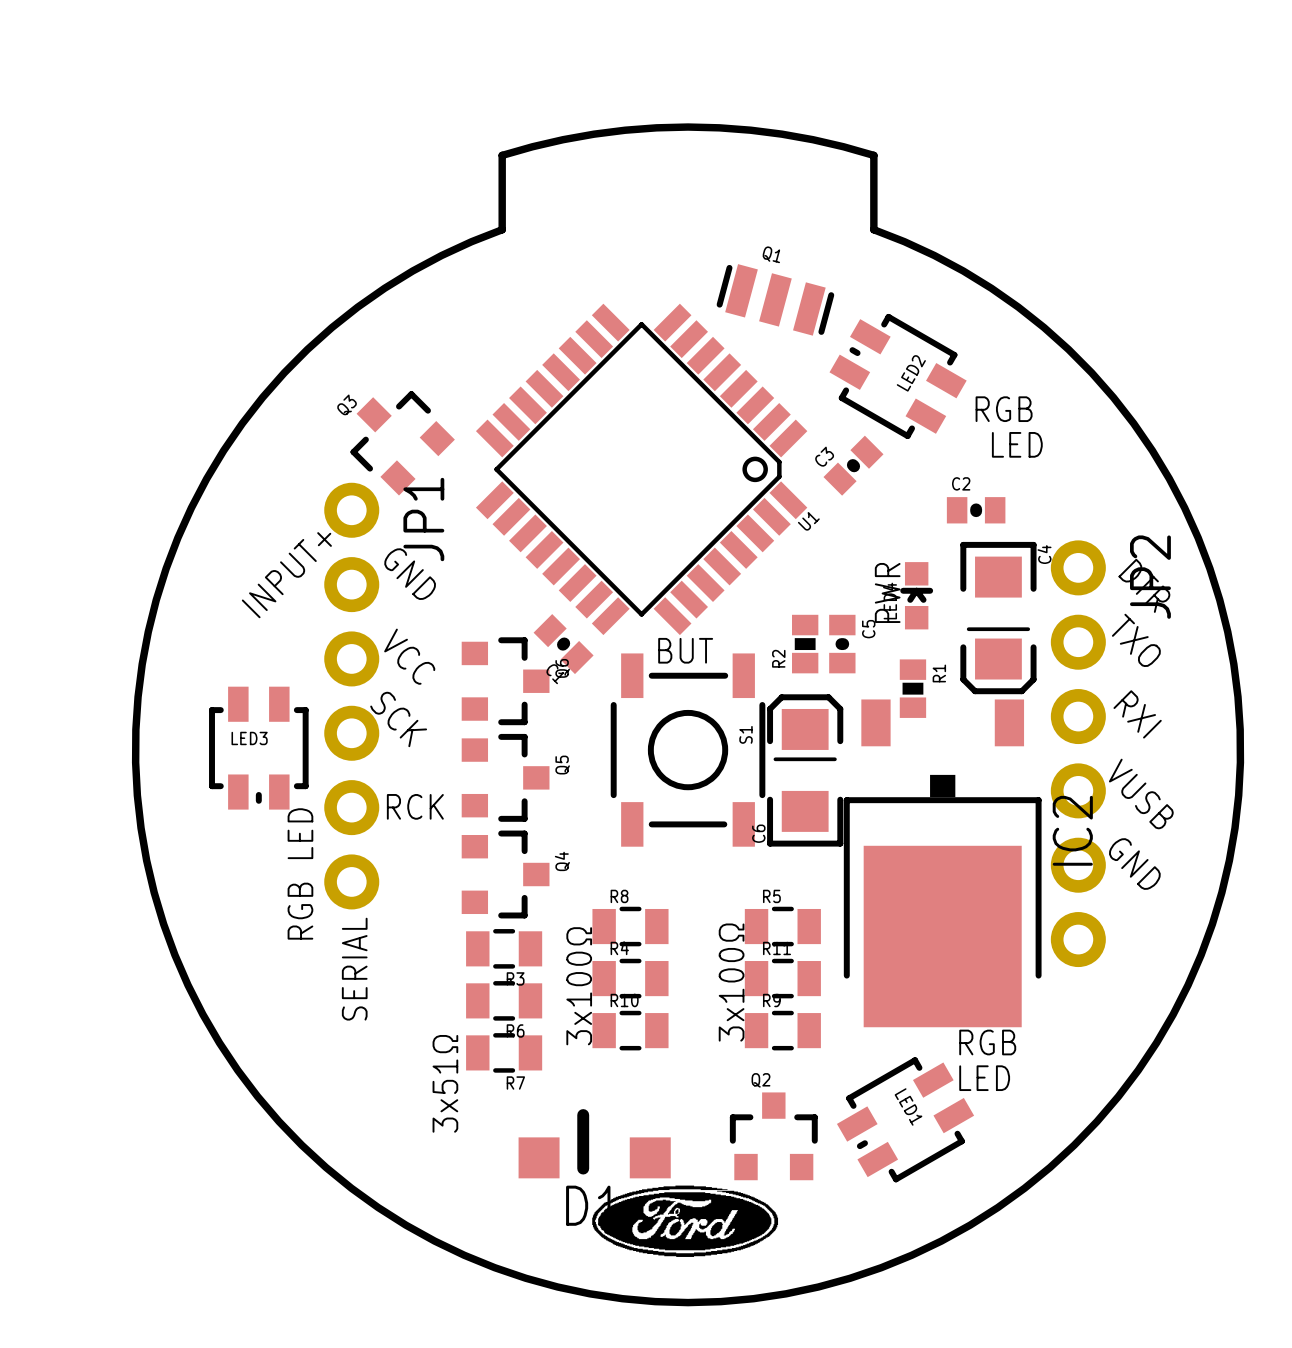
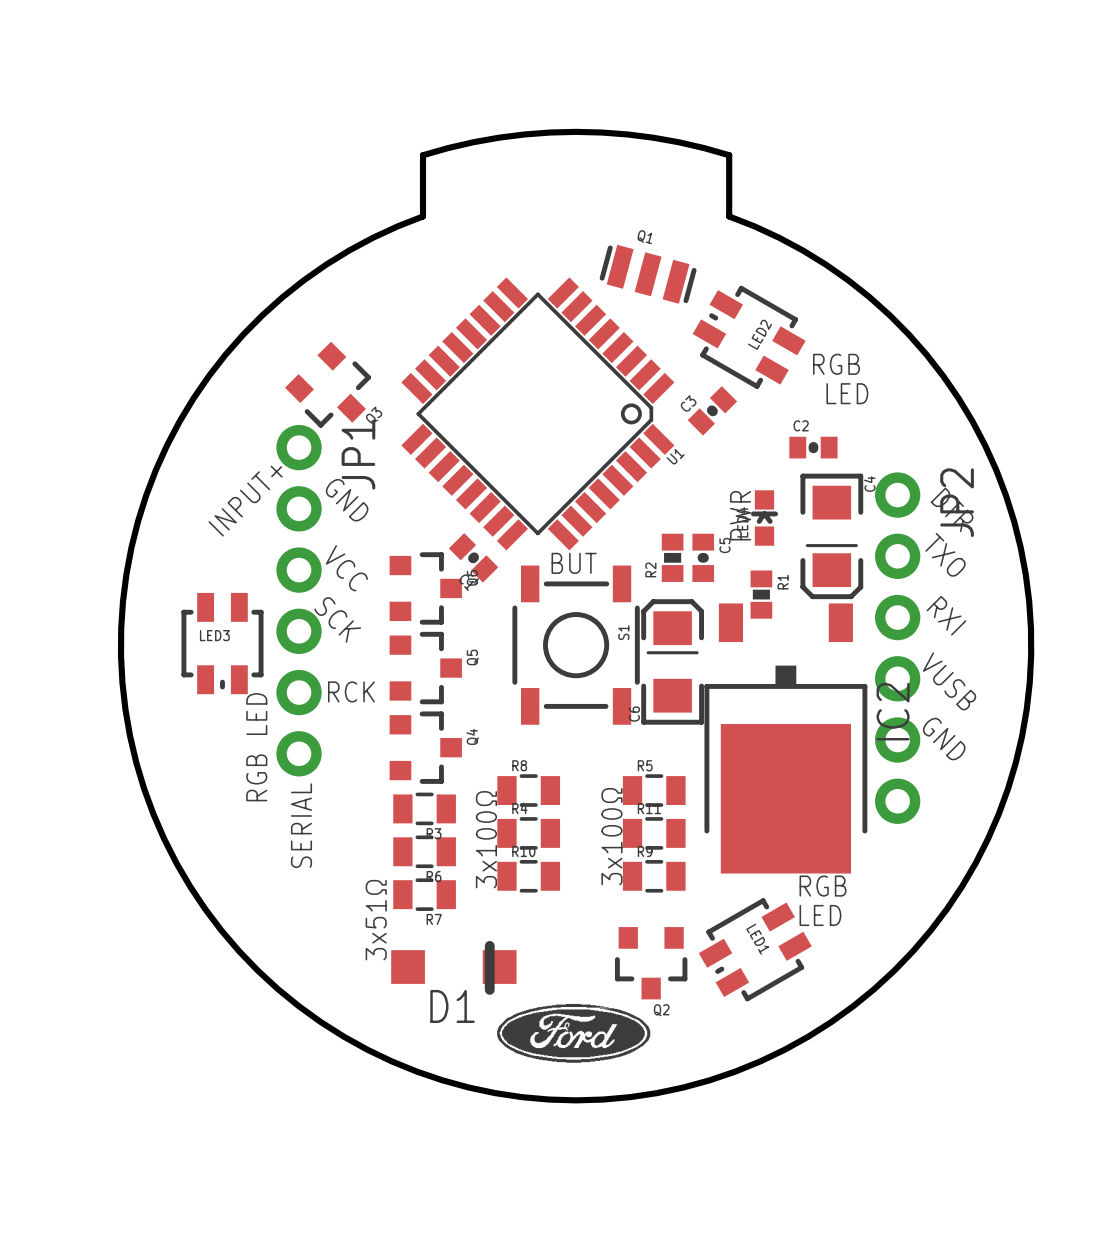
Q3 rotation: 0° (402, 443) -> 180° (327, 384)
Q2 rotation: 0° (773, 1136) -> 180° (651, 963)
D1 position: (594, 1157) -> (453, 967)

